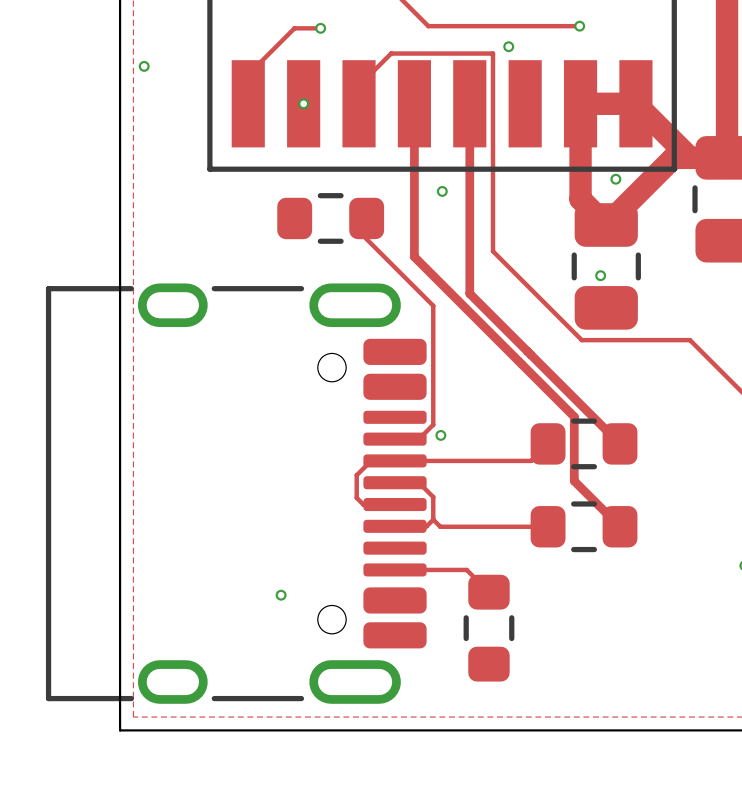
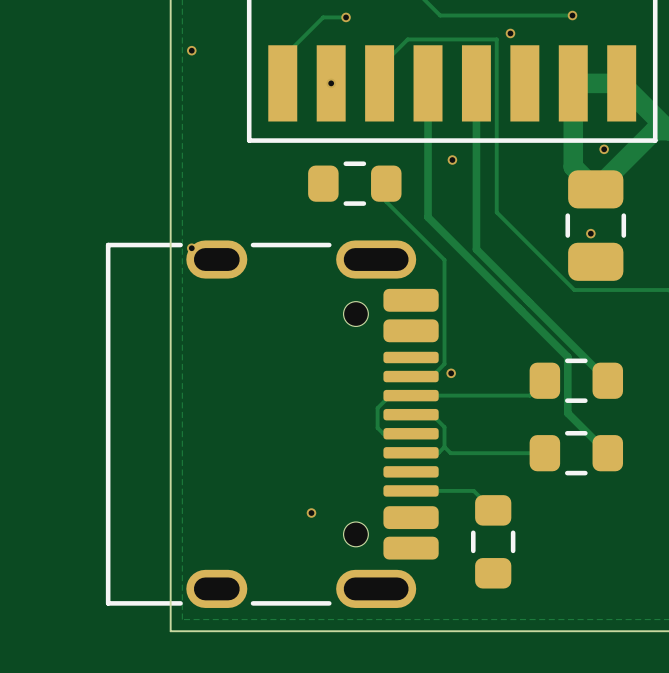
via: none -> (191, 248)

